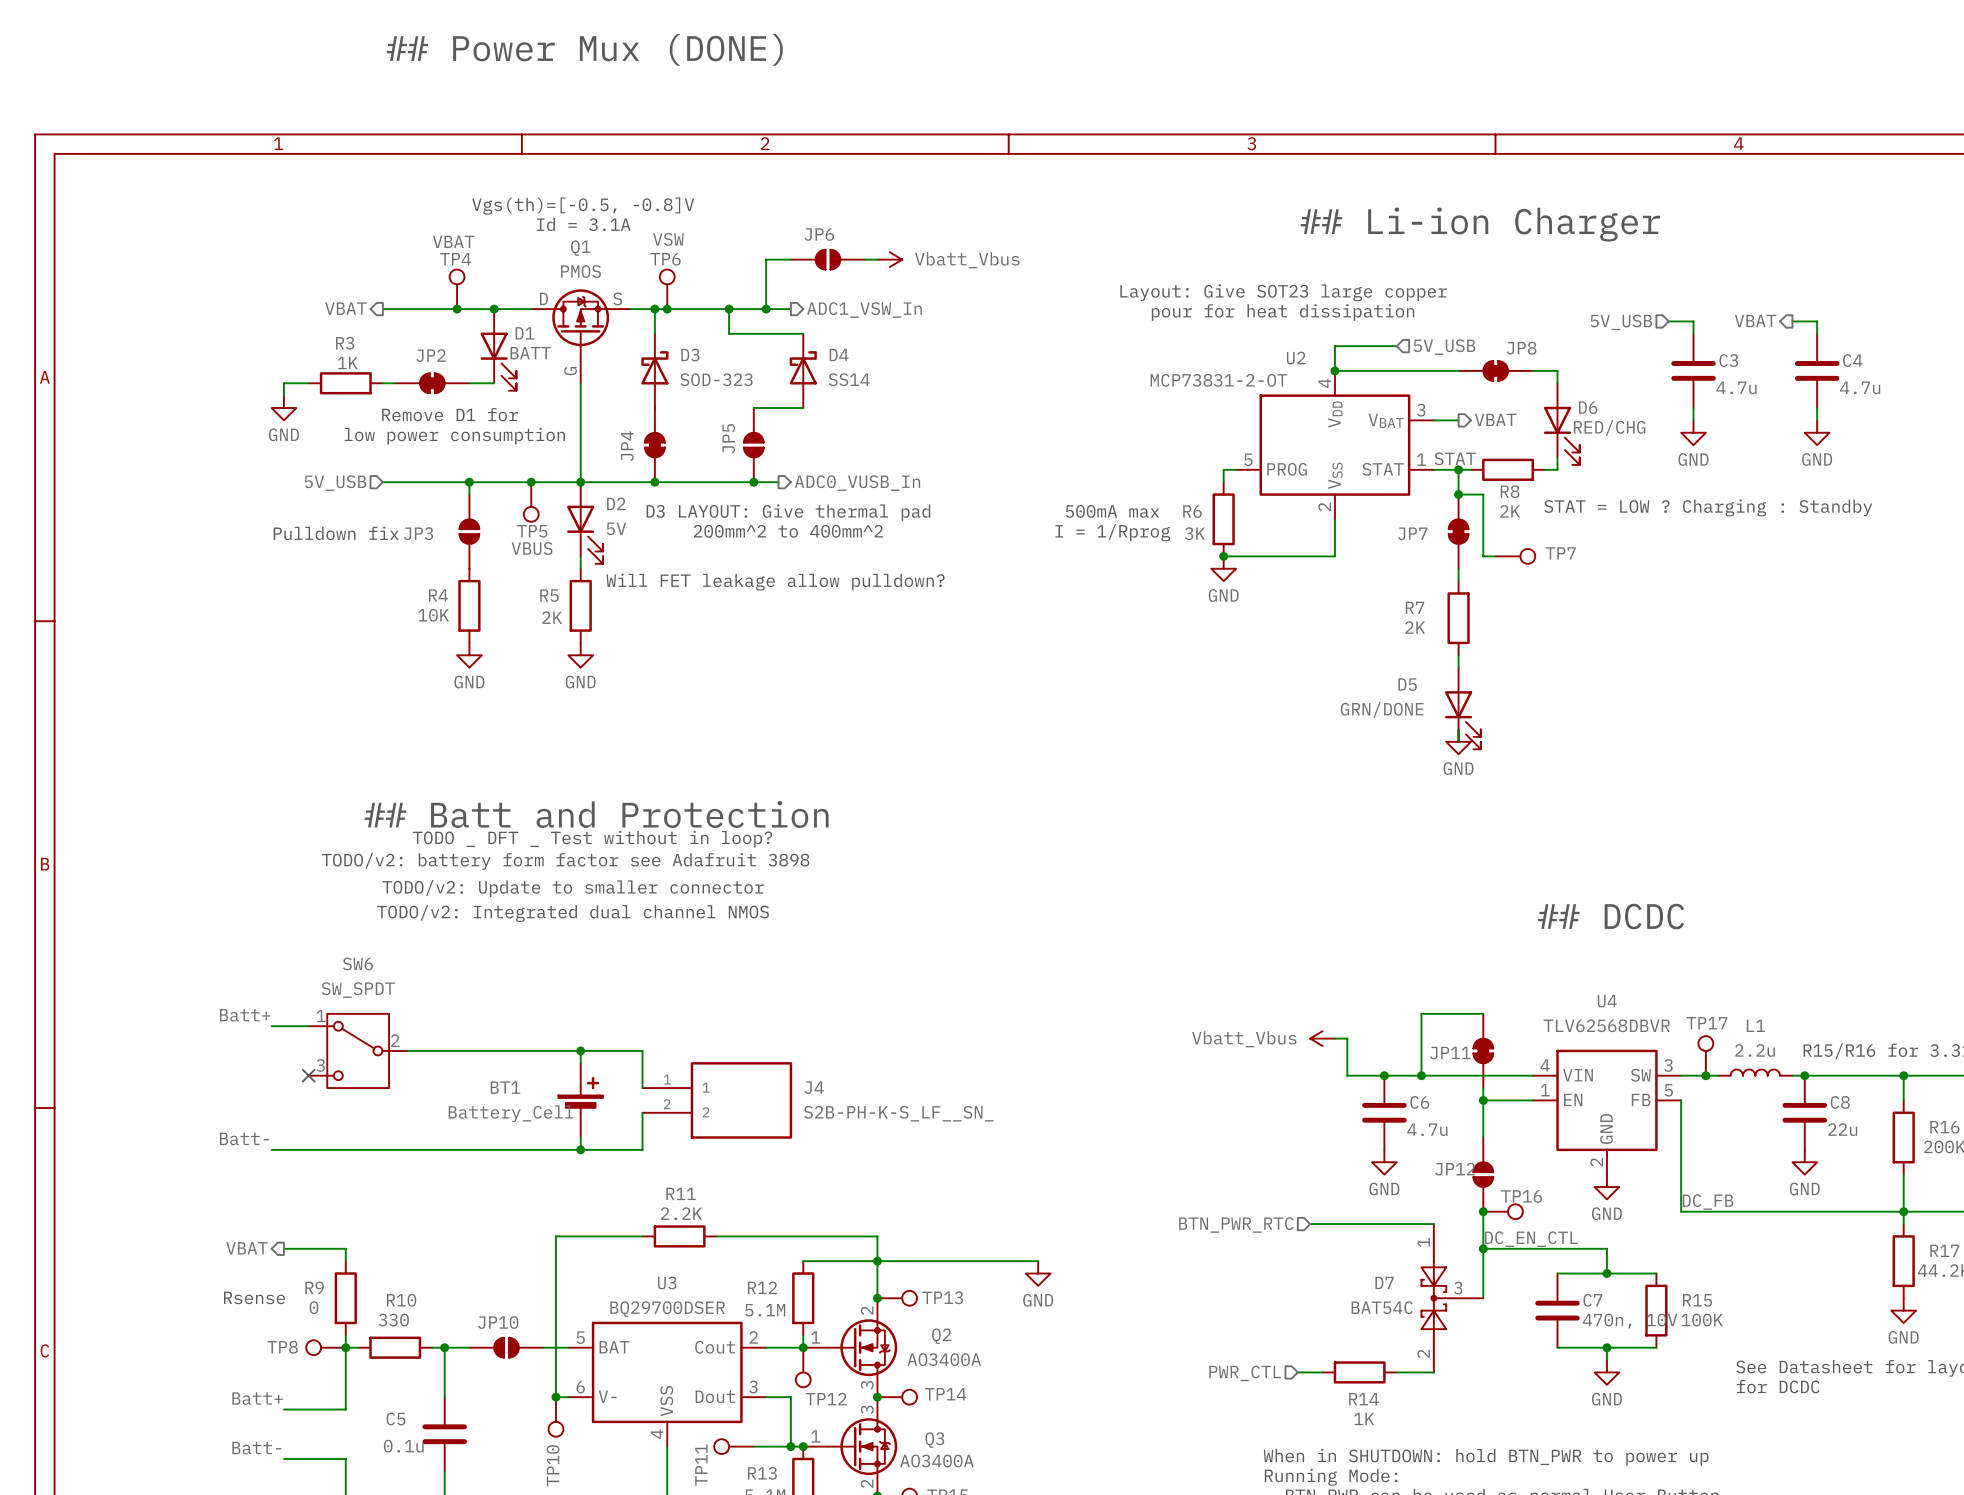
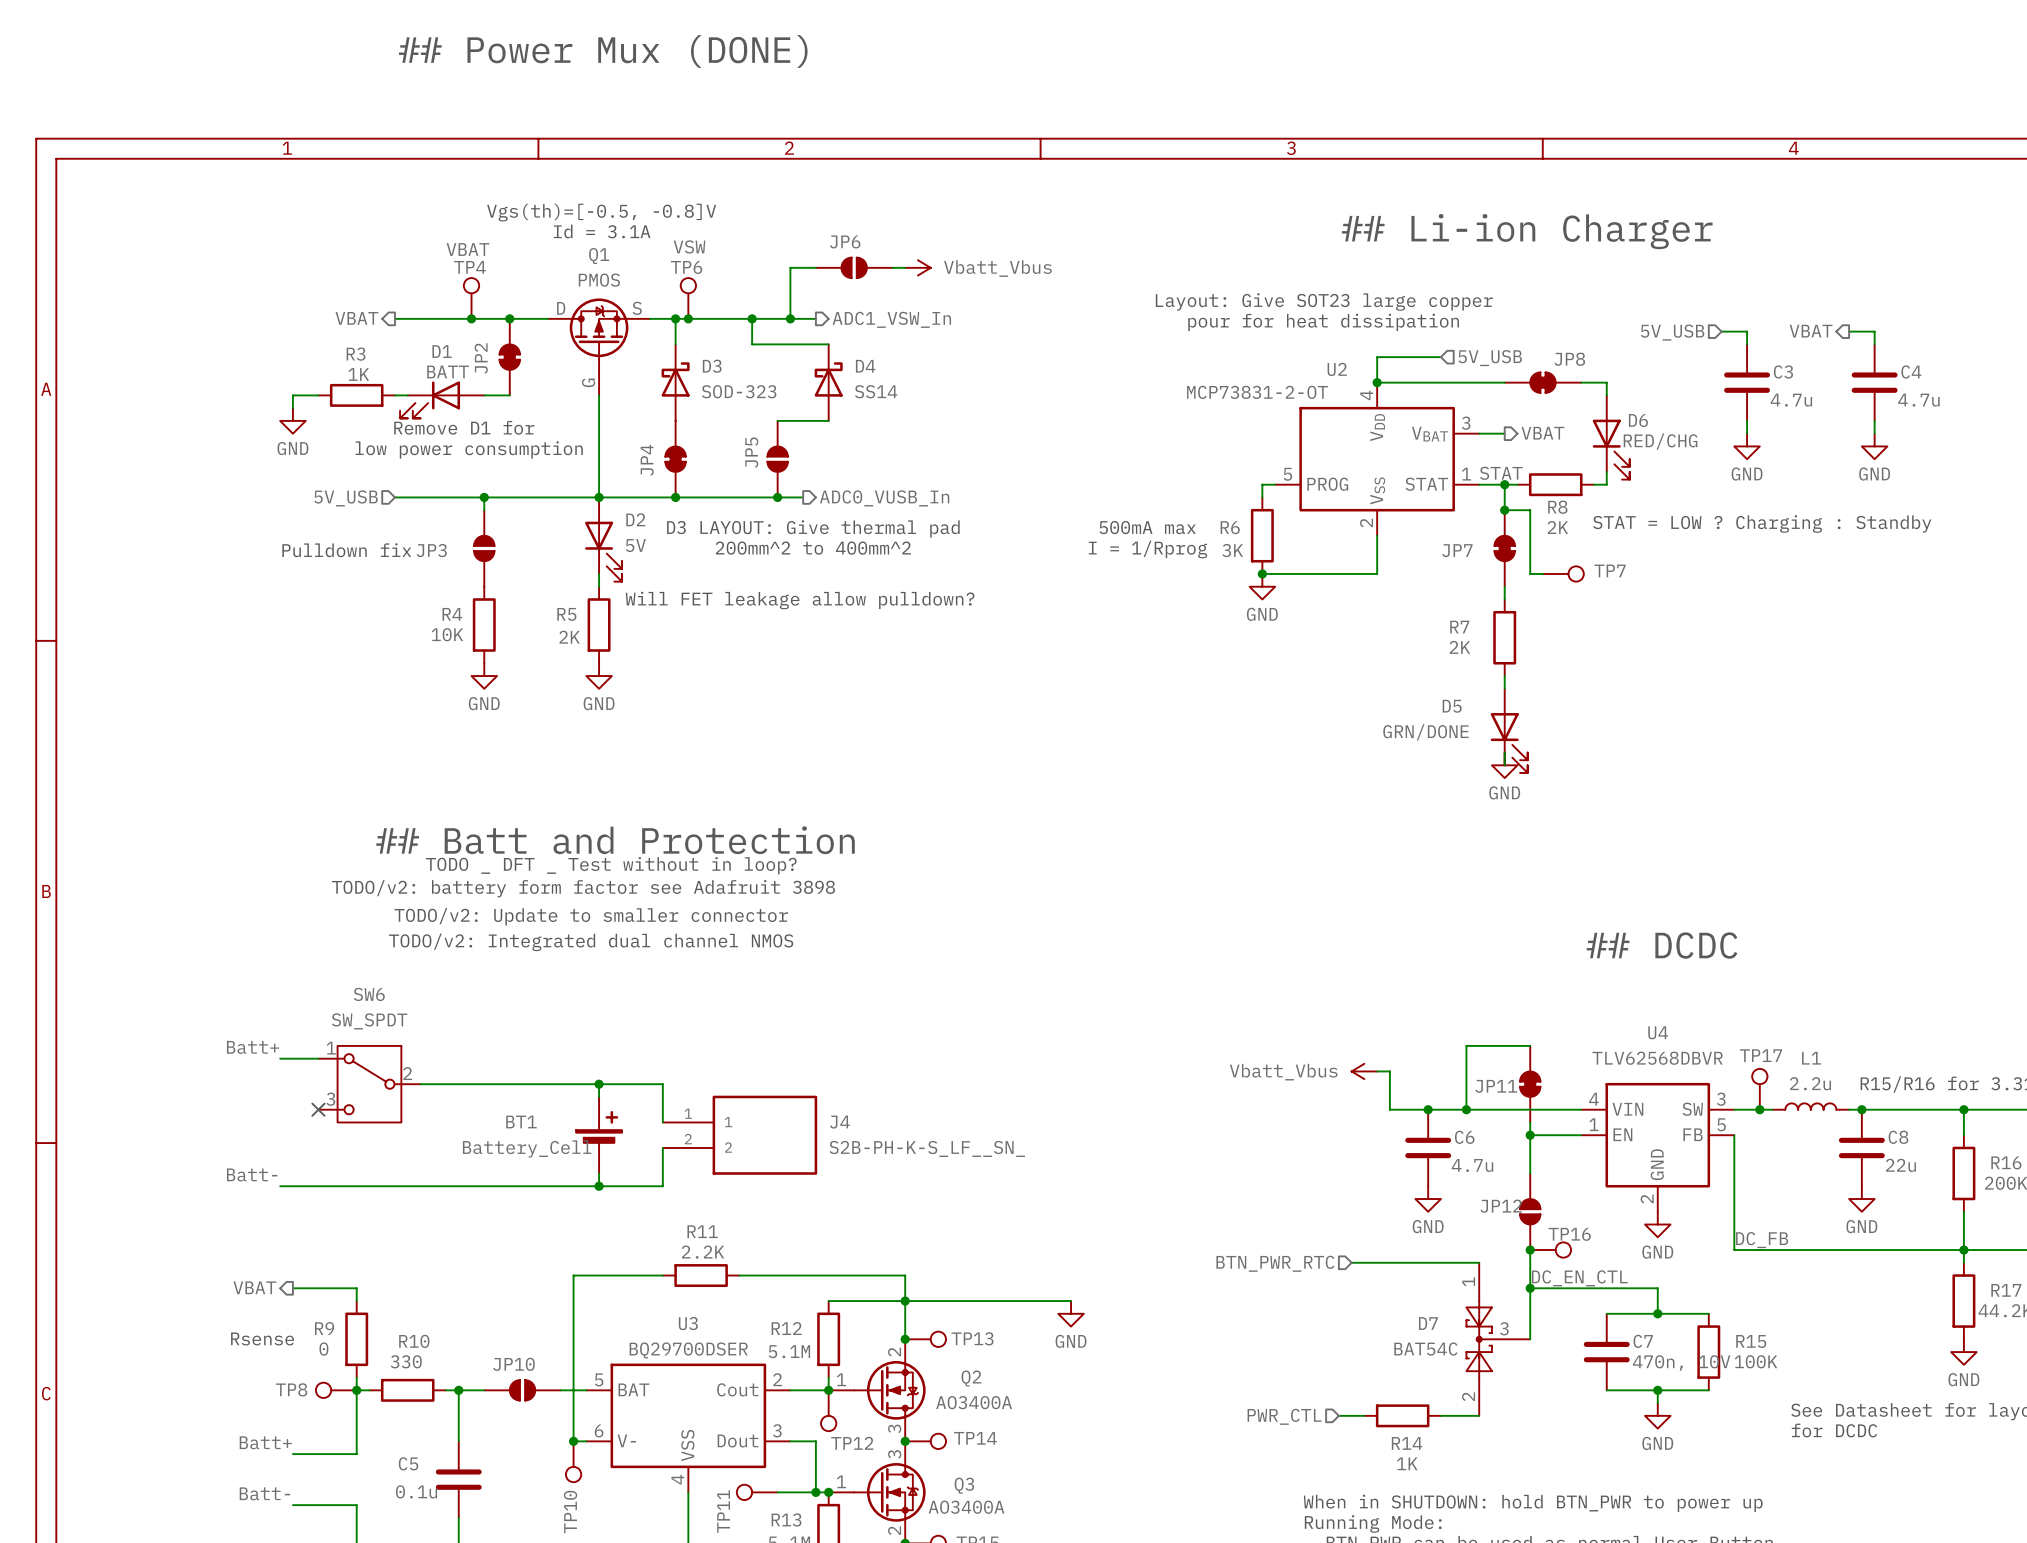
D1 name position: D1 (524, 333) -> D1 (442, 351)
D1 position: (498, 349) -> (442, 399)
D1 value position: BATT (530, 353) -> BATT (448, 371)
JP2 name position: JP2 (431, 355) -> JP2 (481, 358)
D1 rotation: 0° (498, 361) -> 90° clockwise (430, 399)
JP2 rotation: 0° (432, 383) -> 90° clockwise (509, 357)
JP2 position: (432, 383) -> (509, 357)
junction: (531, 482) -> none
TP5: VBUS (531, 501) -> none

